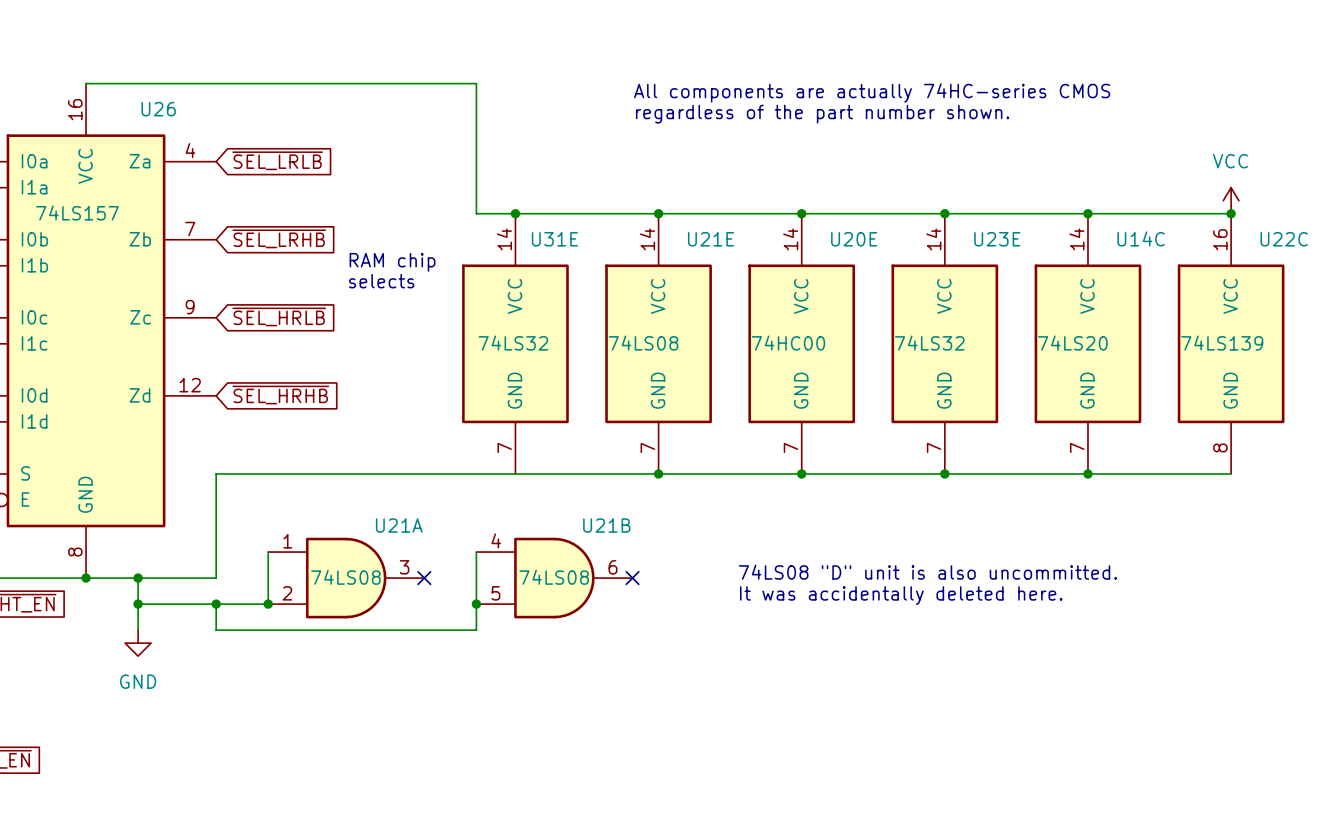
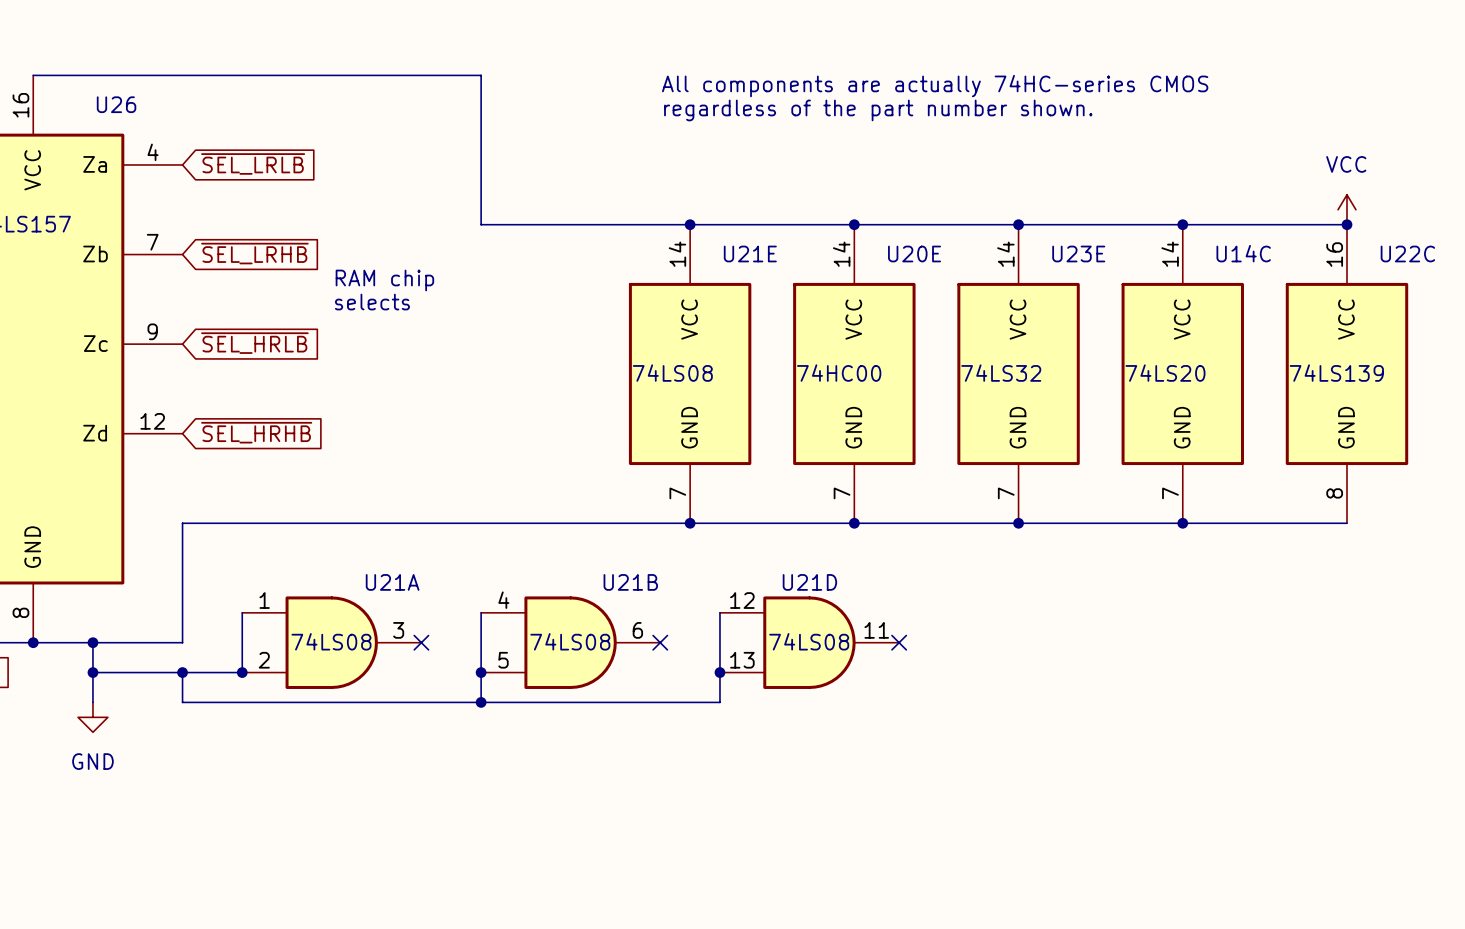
junction: (515, 213) -> none
U31E: 74LS32 (515, 343) -> none
wire: none -> (719, 612) (719, 702) (481, 702)
text: 74LS08 "D" unit is also uncommitted. (927, 572) -> none
U21D: none -> 74LS08 (809, 642)
no-connect mark: none -> (899, 642)
text: It was accidentally deleted here. (901, 595) -> none
junction: none -> (719, 672)
junction: none -> (481, 702)

